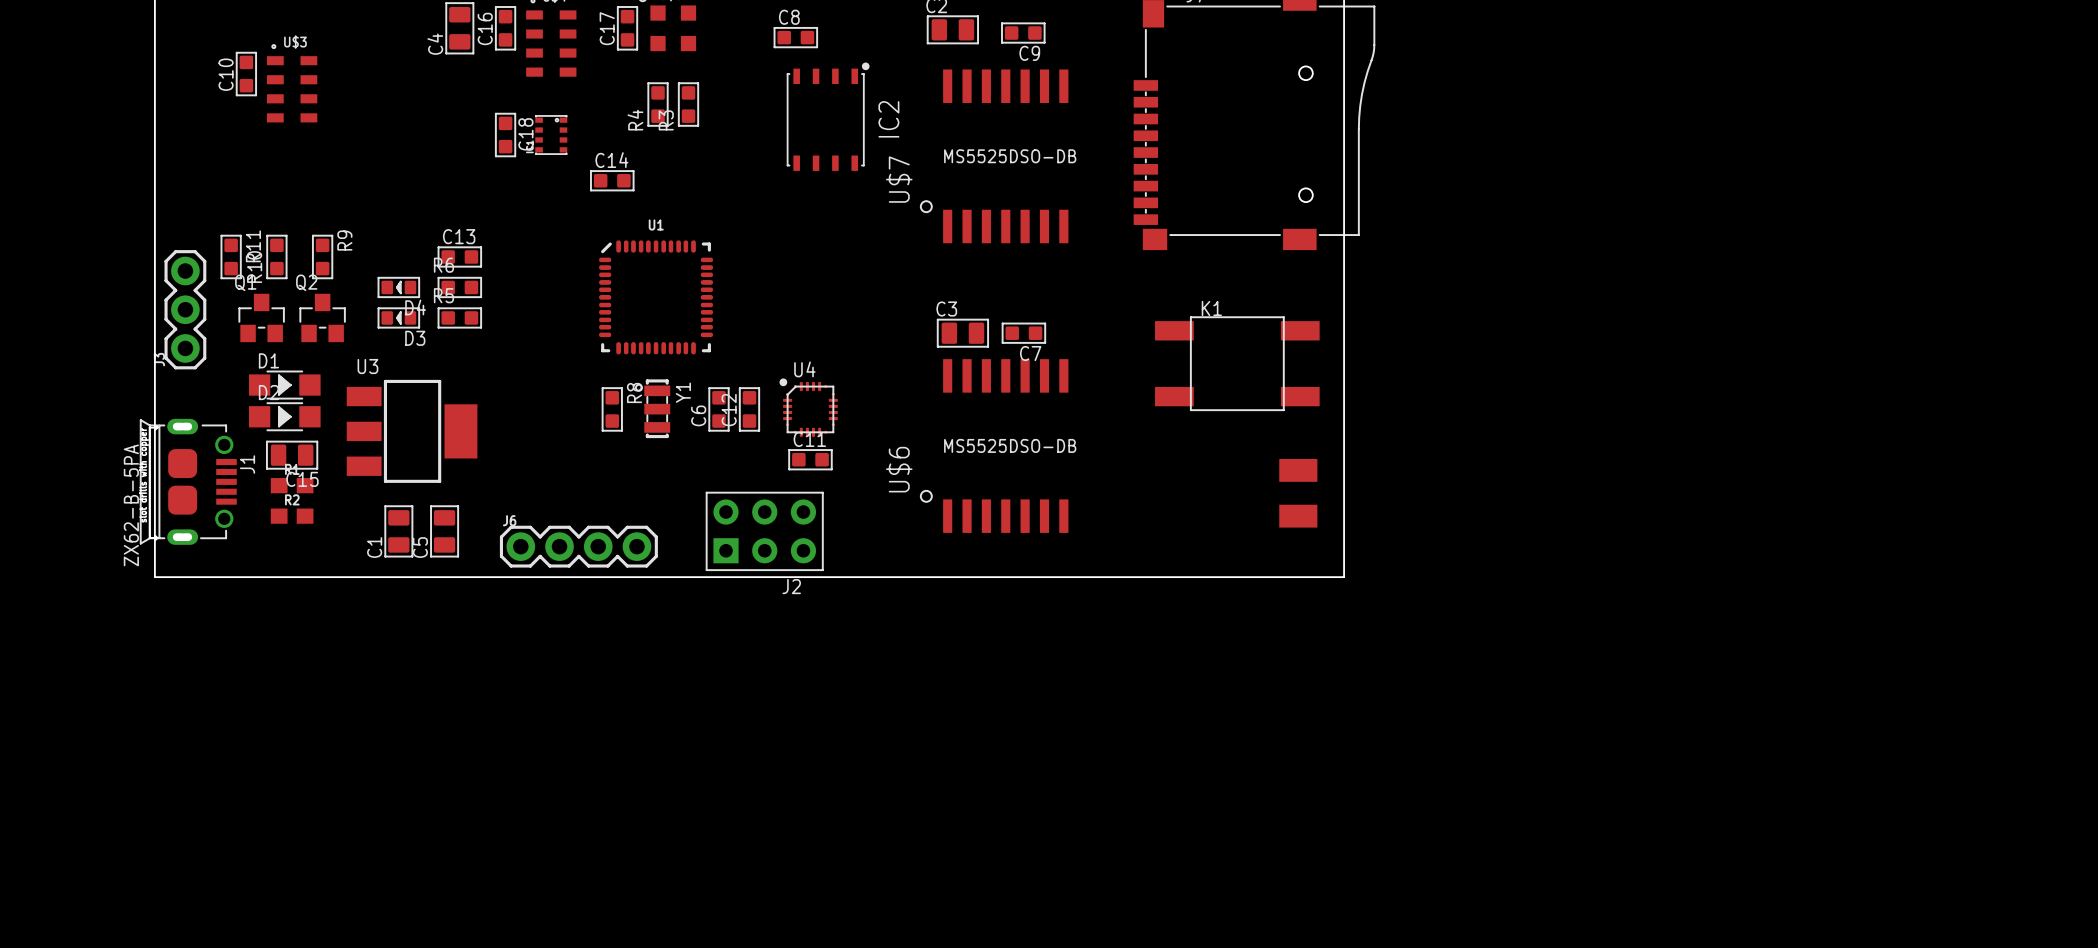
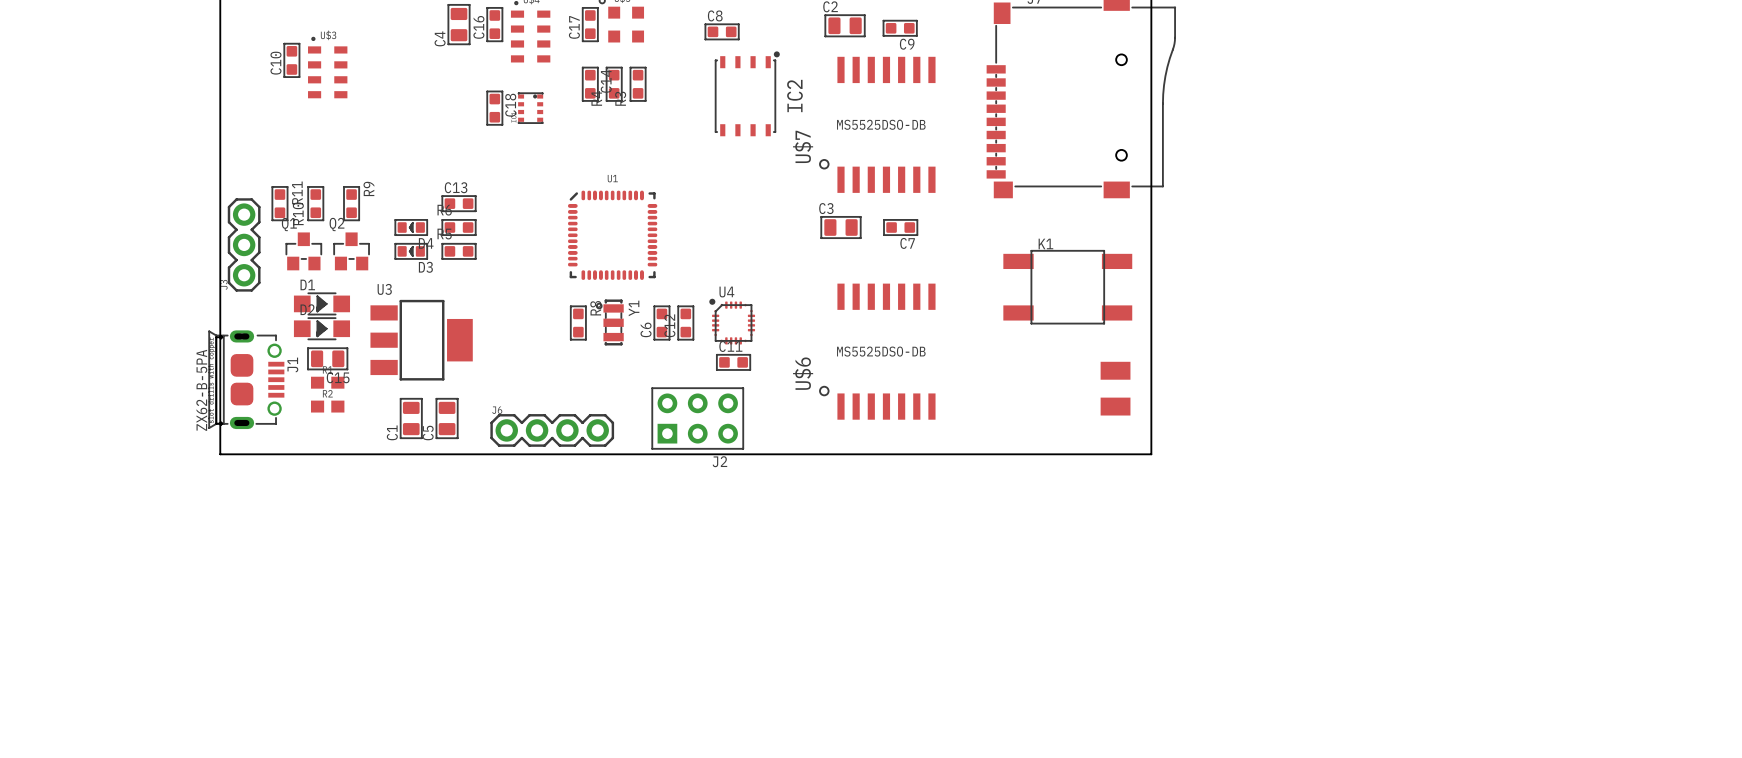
C14 rotation: 0° (612, 180) -> 90° clockwise (590, 84)
C14 position: (612, 180) -> (590, 84)
C3 position: (962, 333) -> (840, 227)
C7 position: (1023, 333) -> (900, 227)

